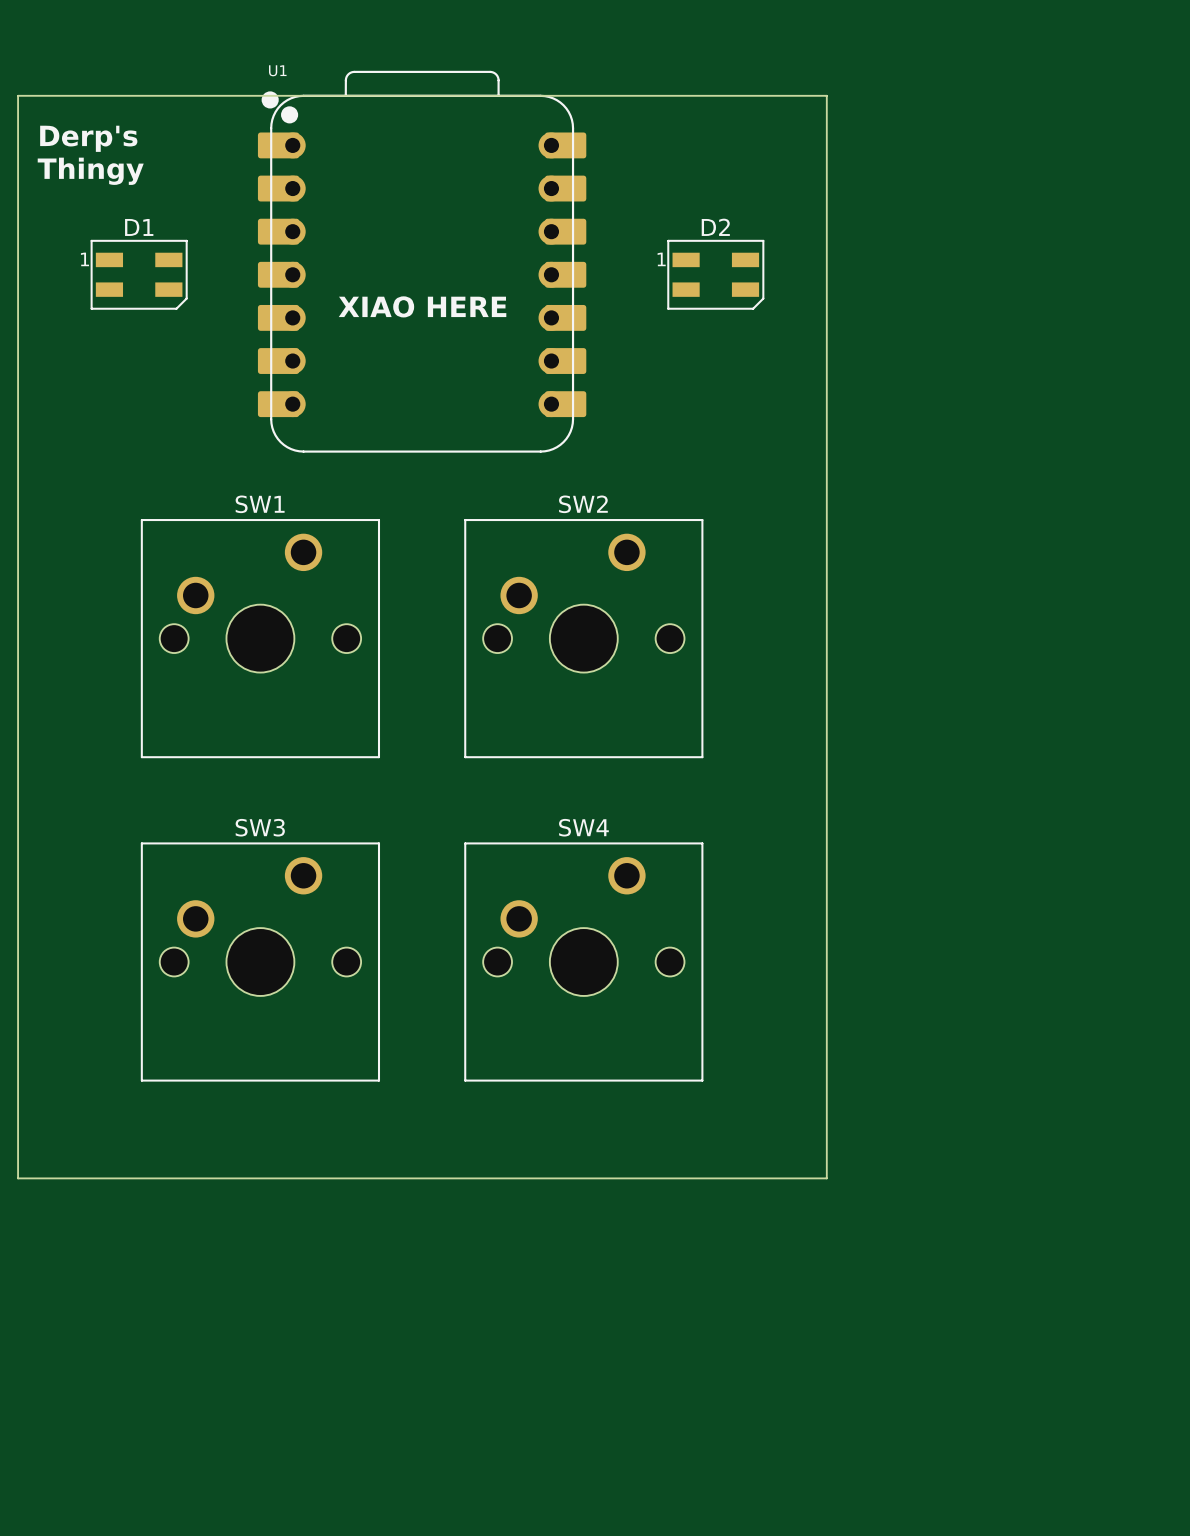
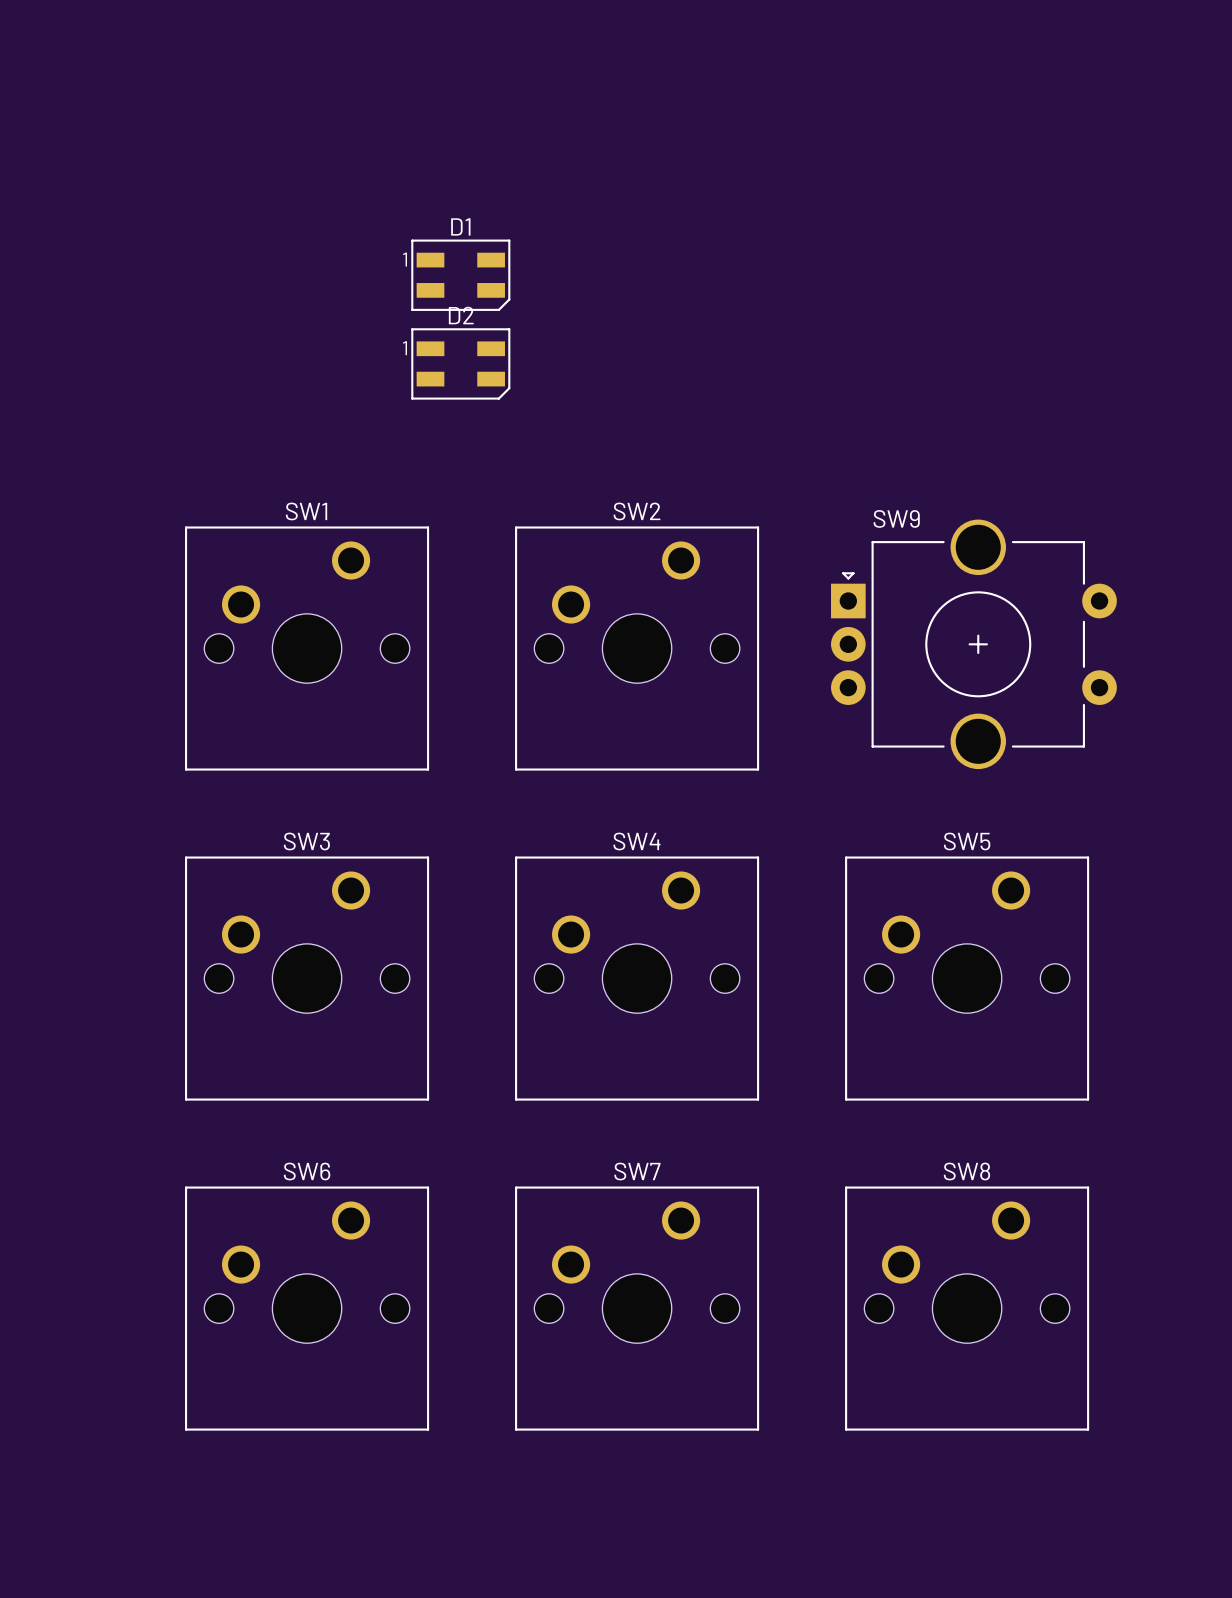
board edge: (18, 95) (826, 95) (826, 1178) (18, 1178) (18, 95) -> none
text: Derp's (88, 138) -> none
text: Thingy (90, 171) -> none
U1: (422, 261) -> none
D1 position: (139, 274) -> (460, 275)
D2 position: (715, 274) -> (460, 363)
text: XIAO HERE (422, 306) -> none
SW9: none -> (973, 644)
SW5: none -> (967, 978)
SW6: none -> (307, 1308)
SW7: none -> (637, 1308)
SW8: none -> (967, 1308)

